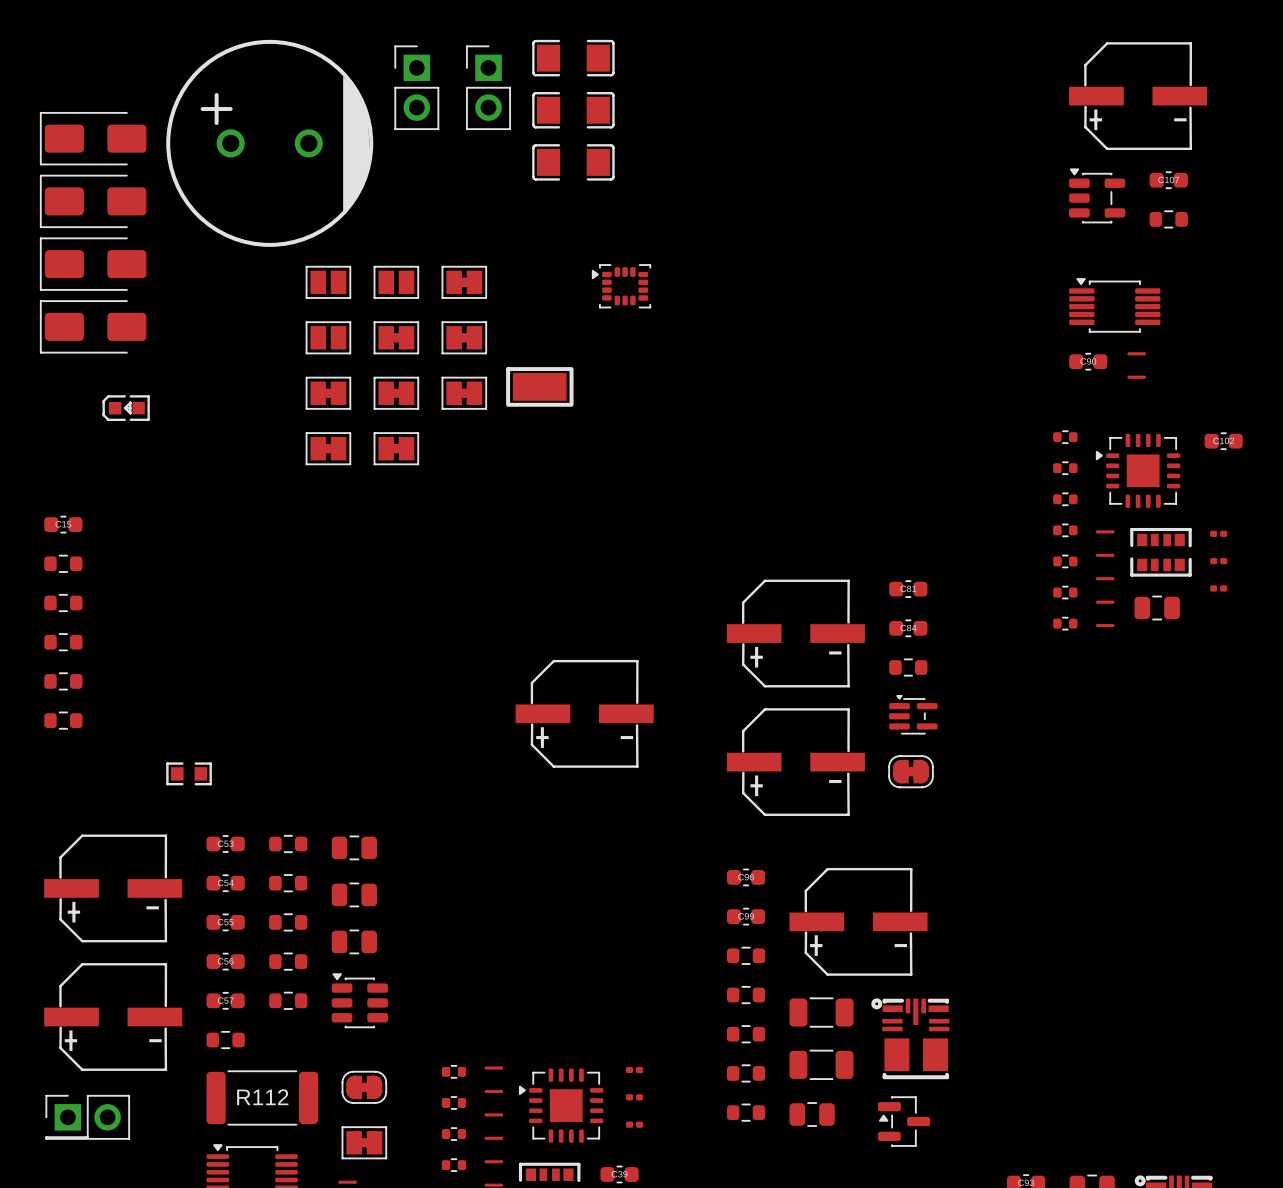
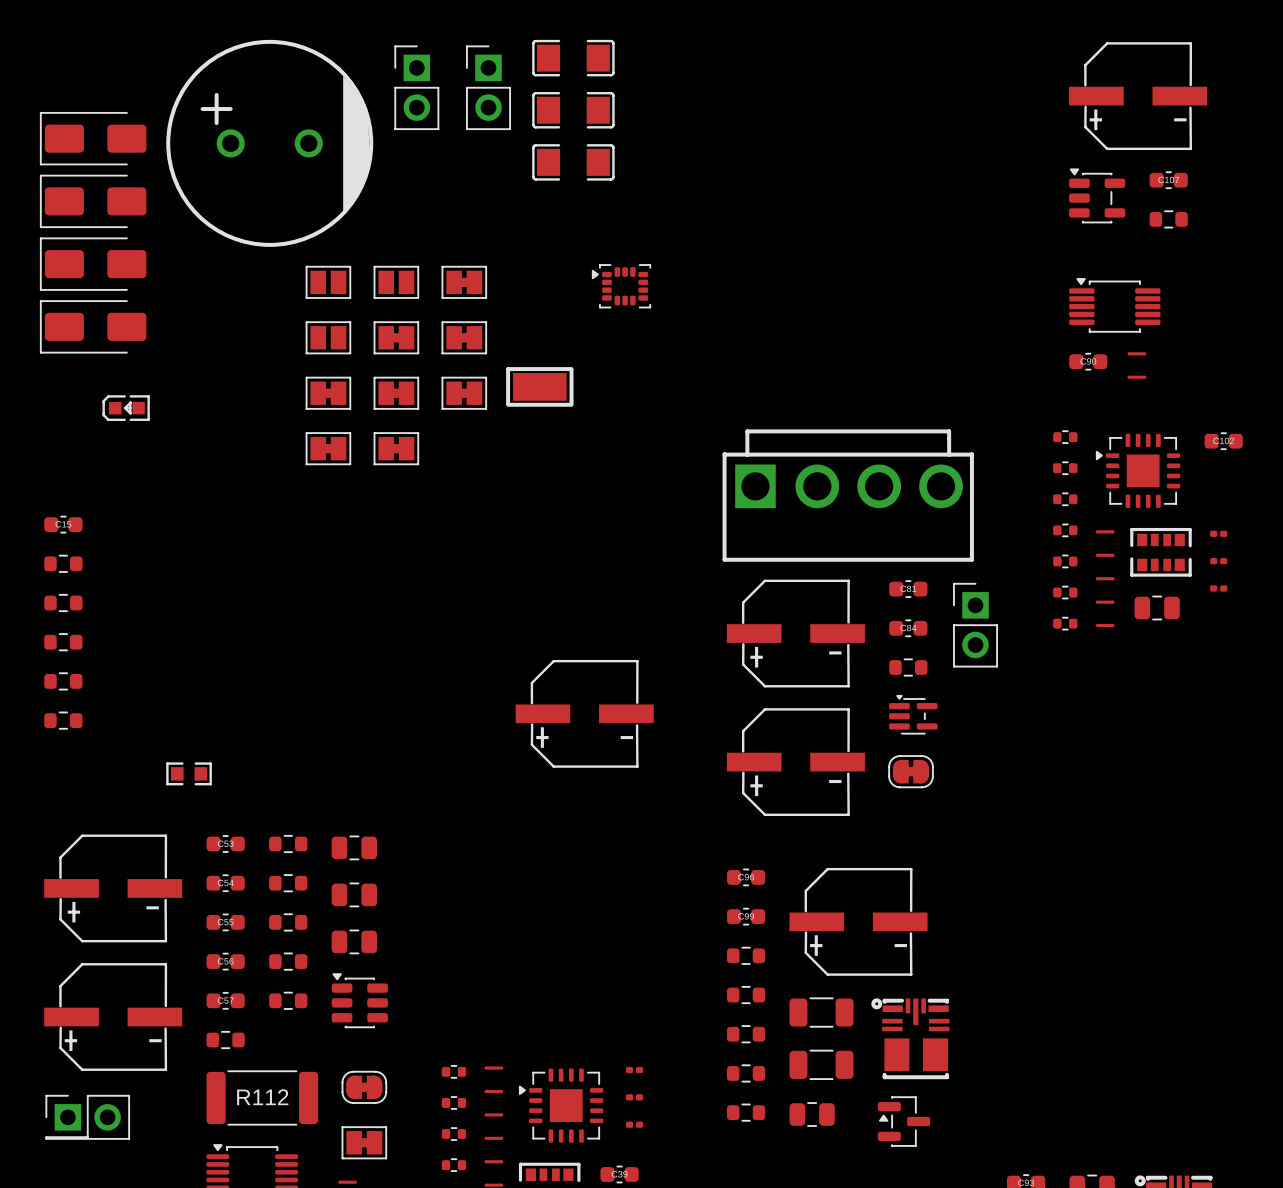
part: none -> (848, 495)
part: none -> (975, 625)

